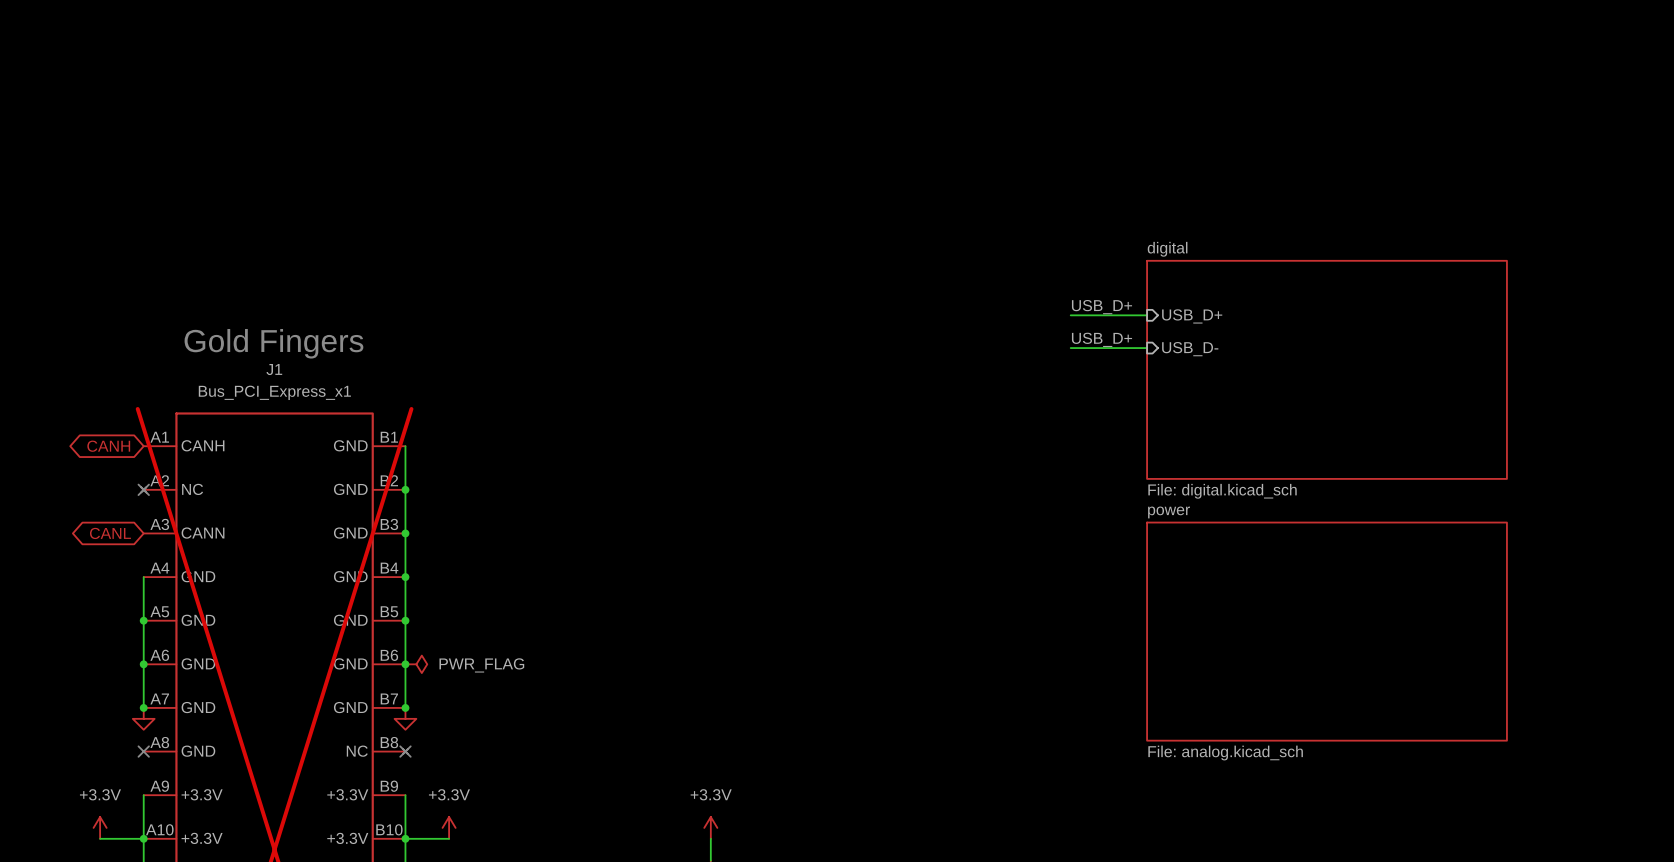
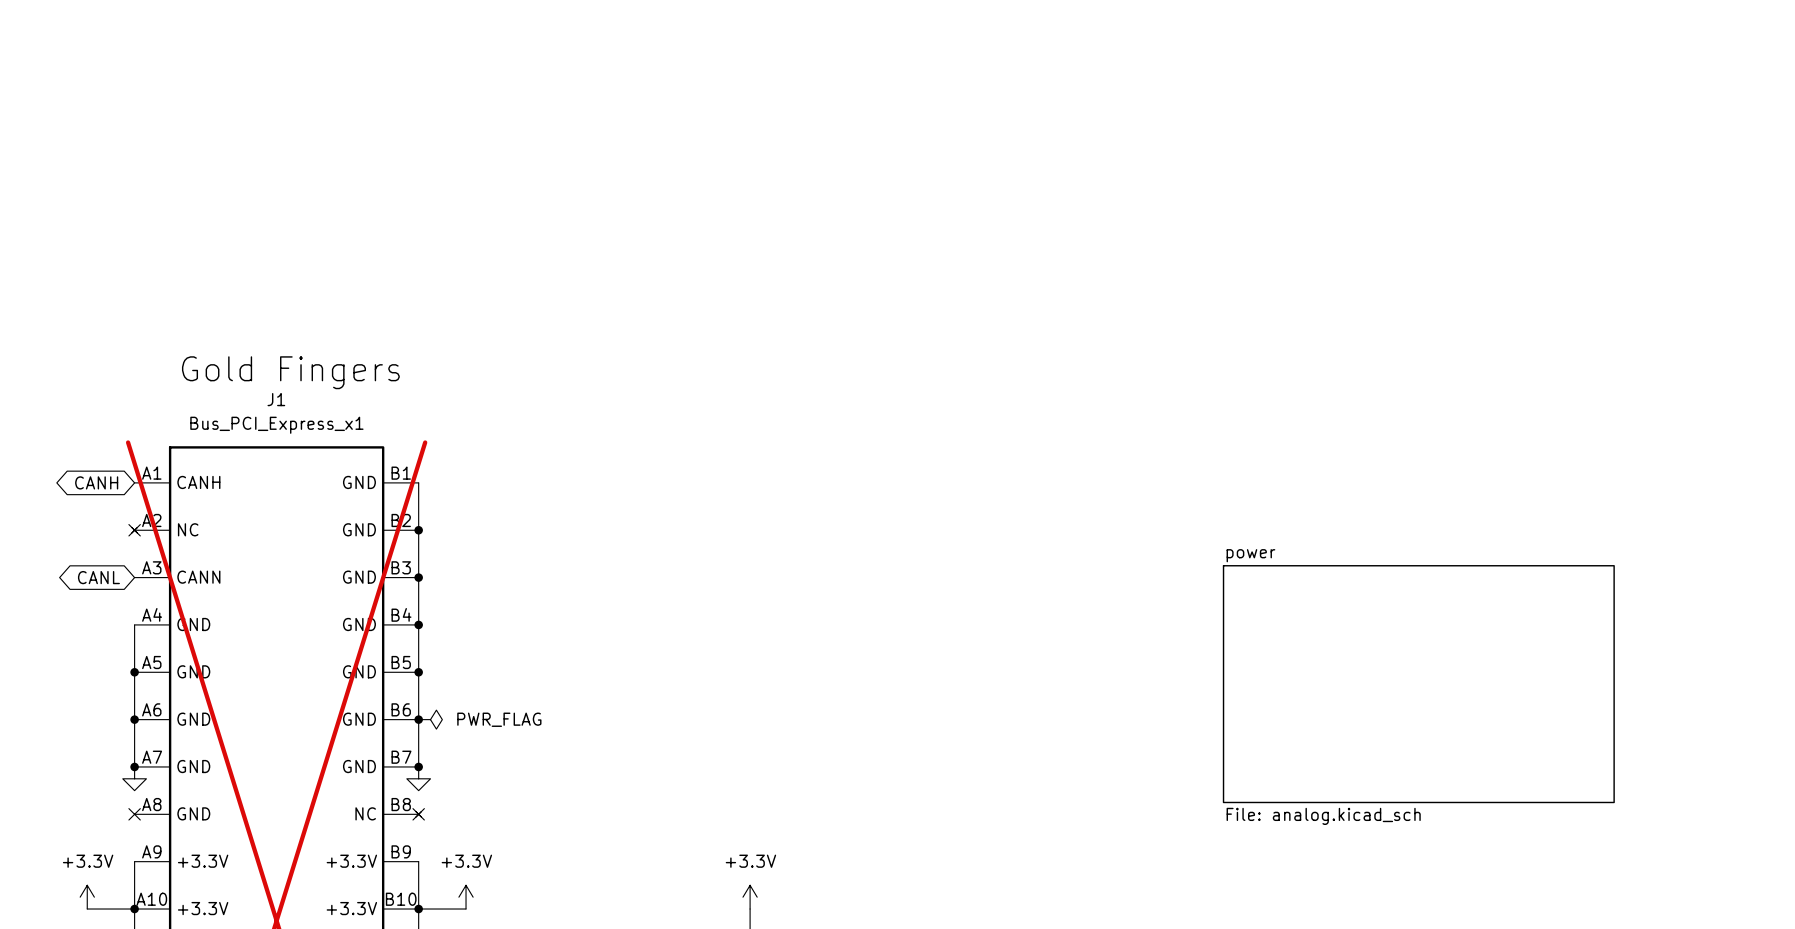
label: USB_D+ (1102, 307) -> none
wire: (1070, 315) (1147, 315) -> none
sheet pin: USB_D+ (1192, 316) -> none
label: USB_D+ (1102, 339) -> none
wire: (1070, 348) (1147, 348) -> none
sheet pin: USB_D- (1190, 349) -> none
sheet digital: File: digital.kicad_sch (1327, 369) -> none

